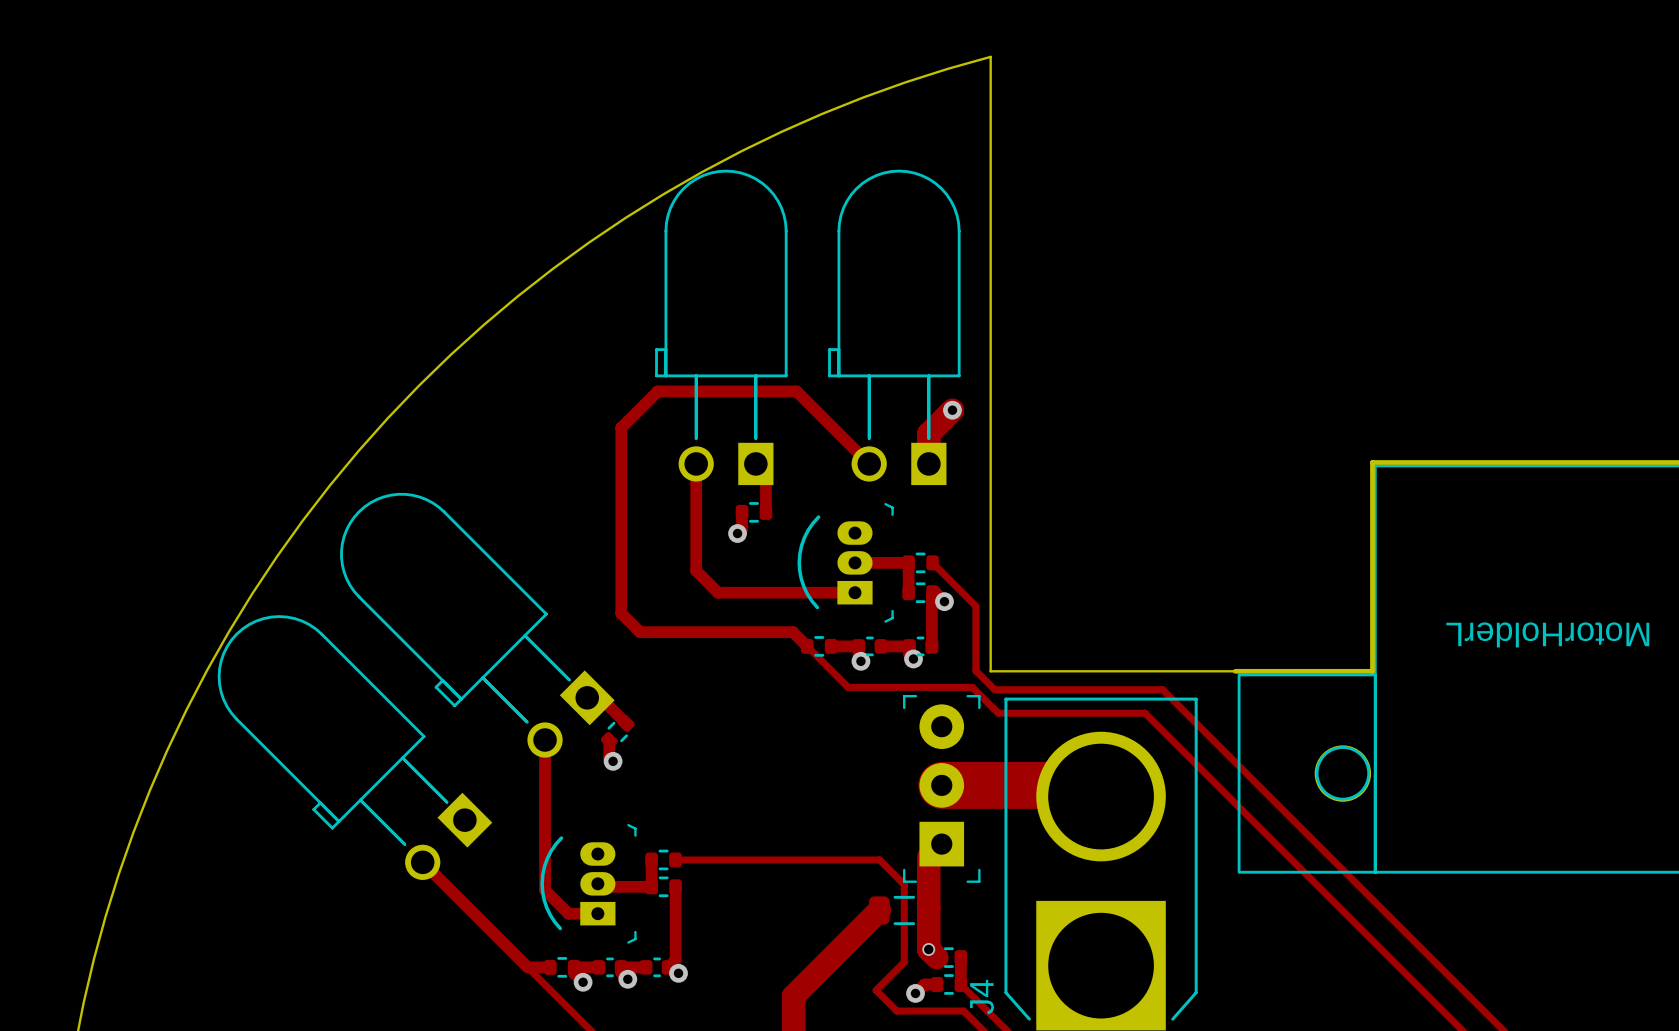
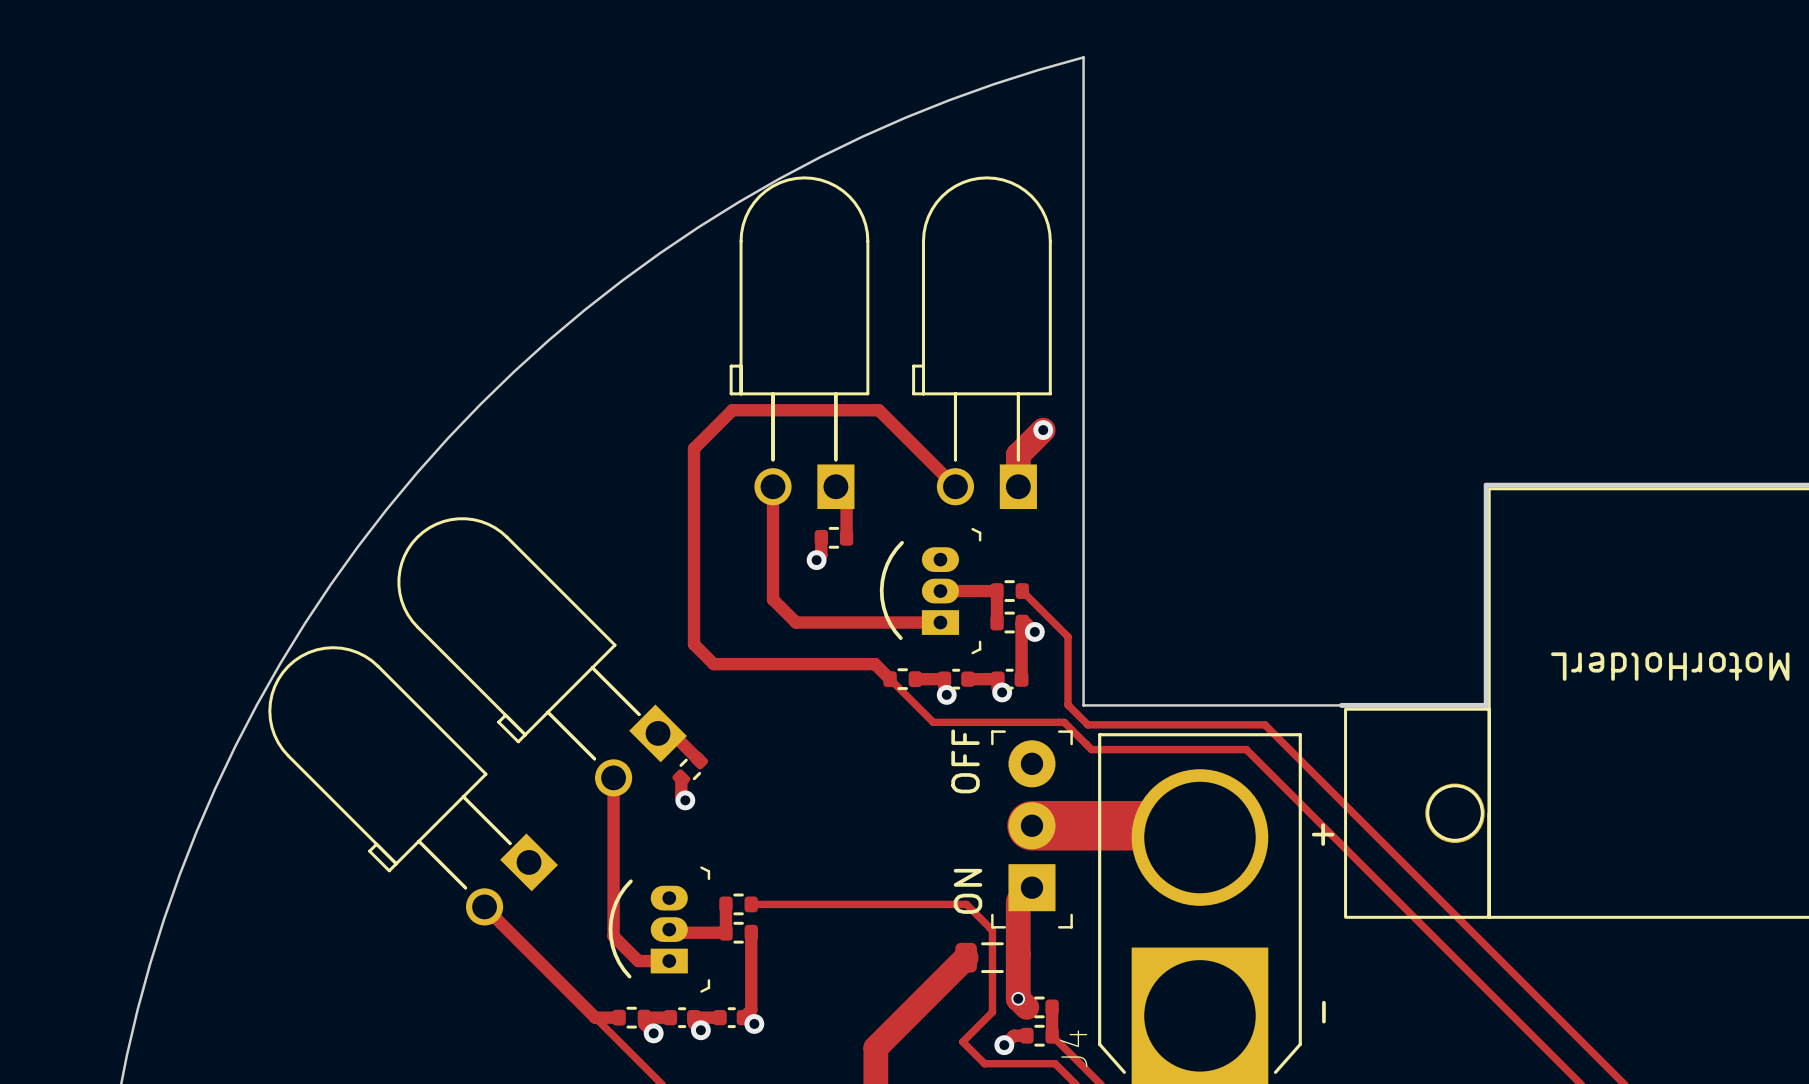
text: none -> OFF (965, 761)
text: none -> + (1323, 834)
text: none -> ON (968, 891)
text: none -> - (1323, 1012)

